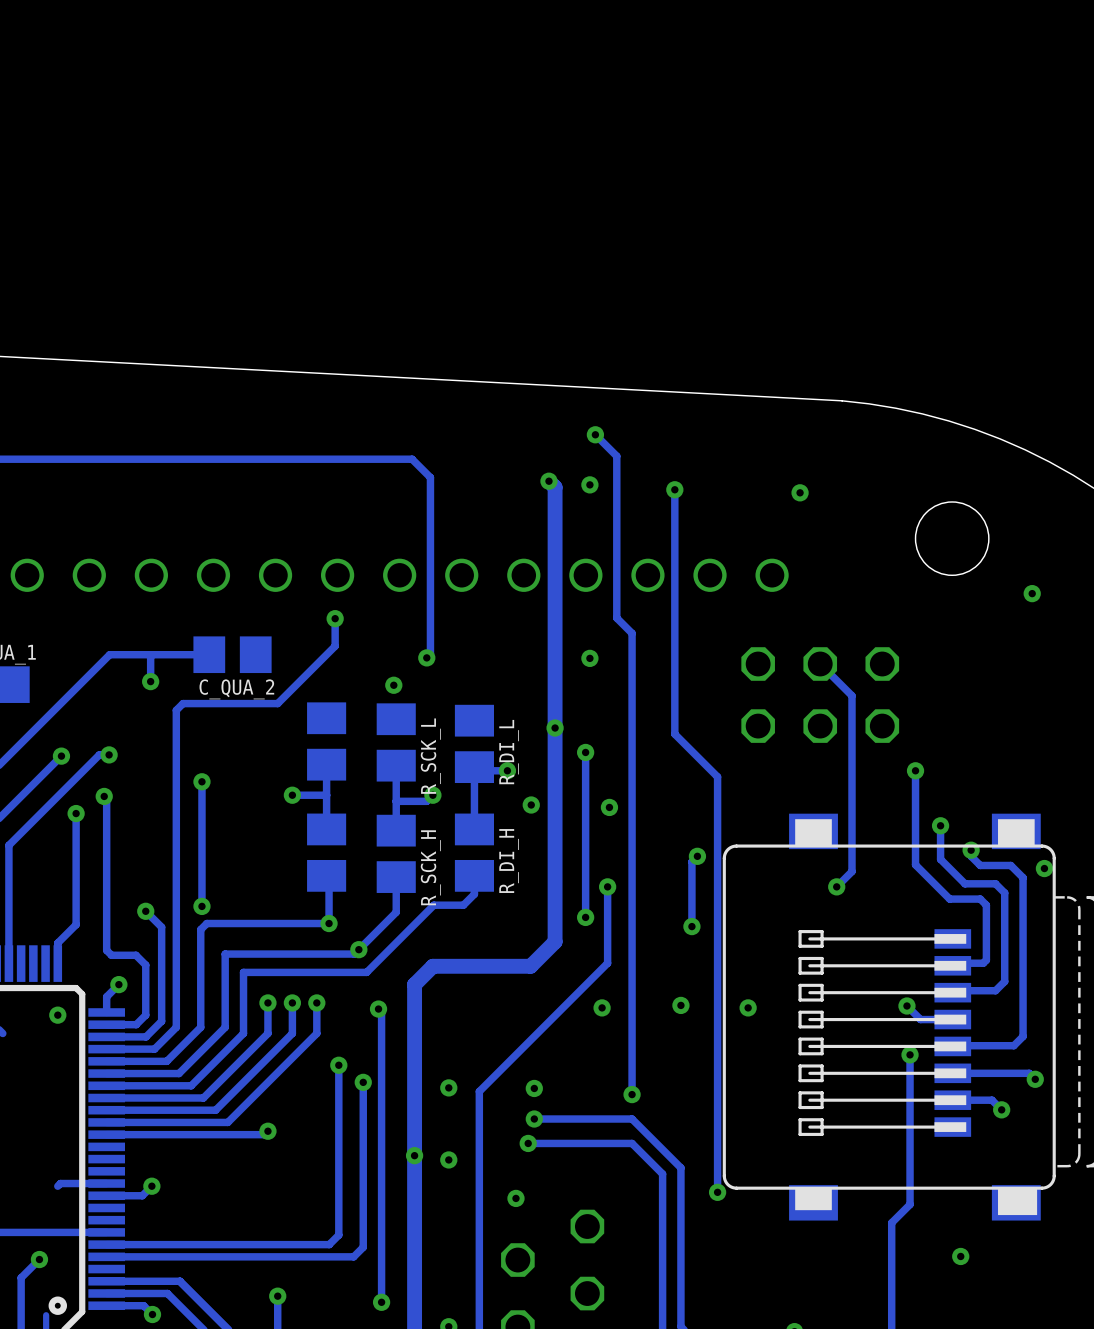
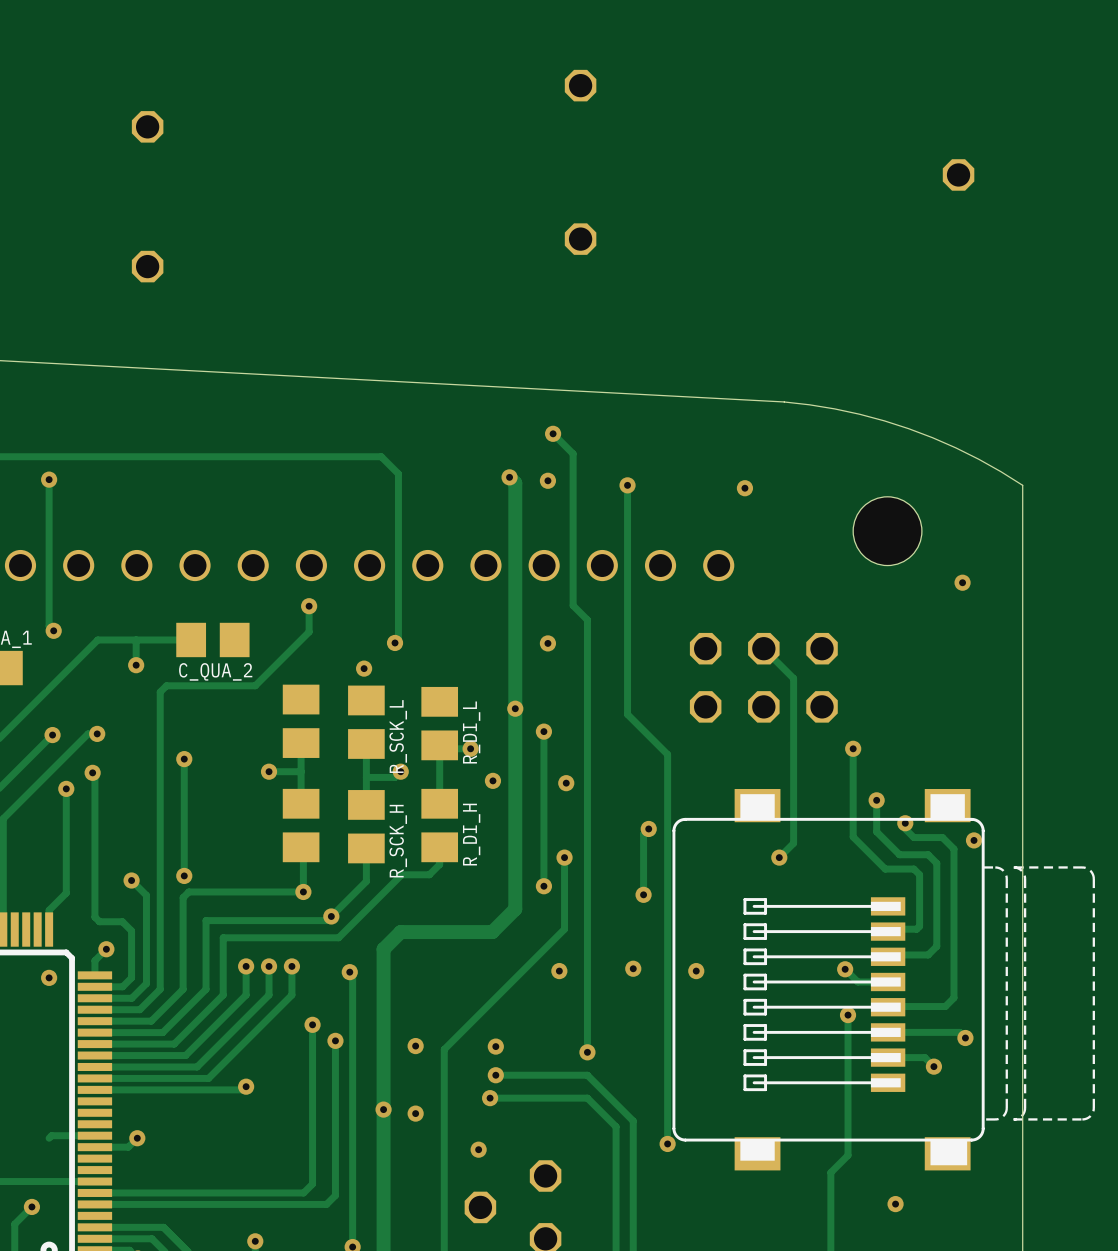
part: none -> (580, 85)
part: none -> (147, 126)
part: none -> (958, 174)
part: none -> (580, 239)
part: none -> (147, 266)
track: none -> (49, 479) (49, 626) (53, 630)
via: none -> (49, 479)
via: none -> (53, 630)

